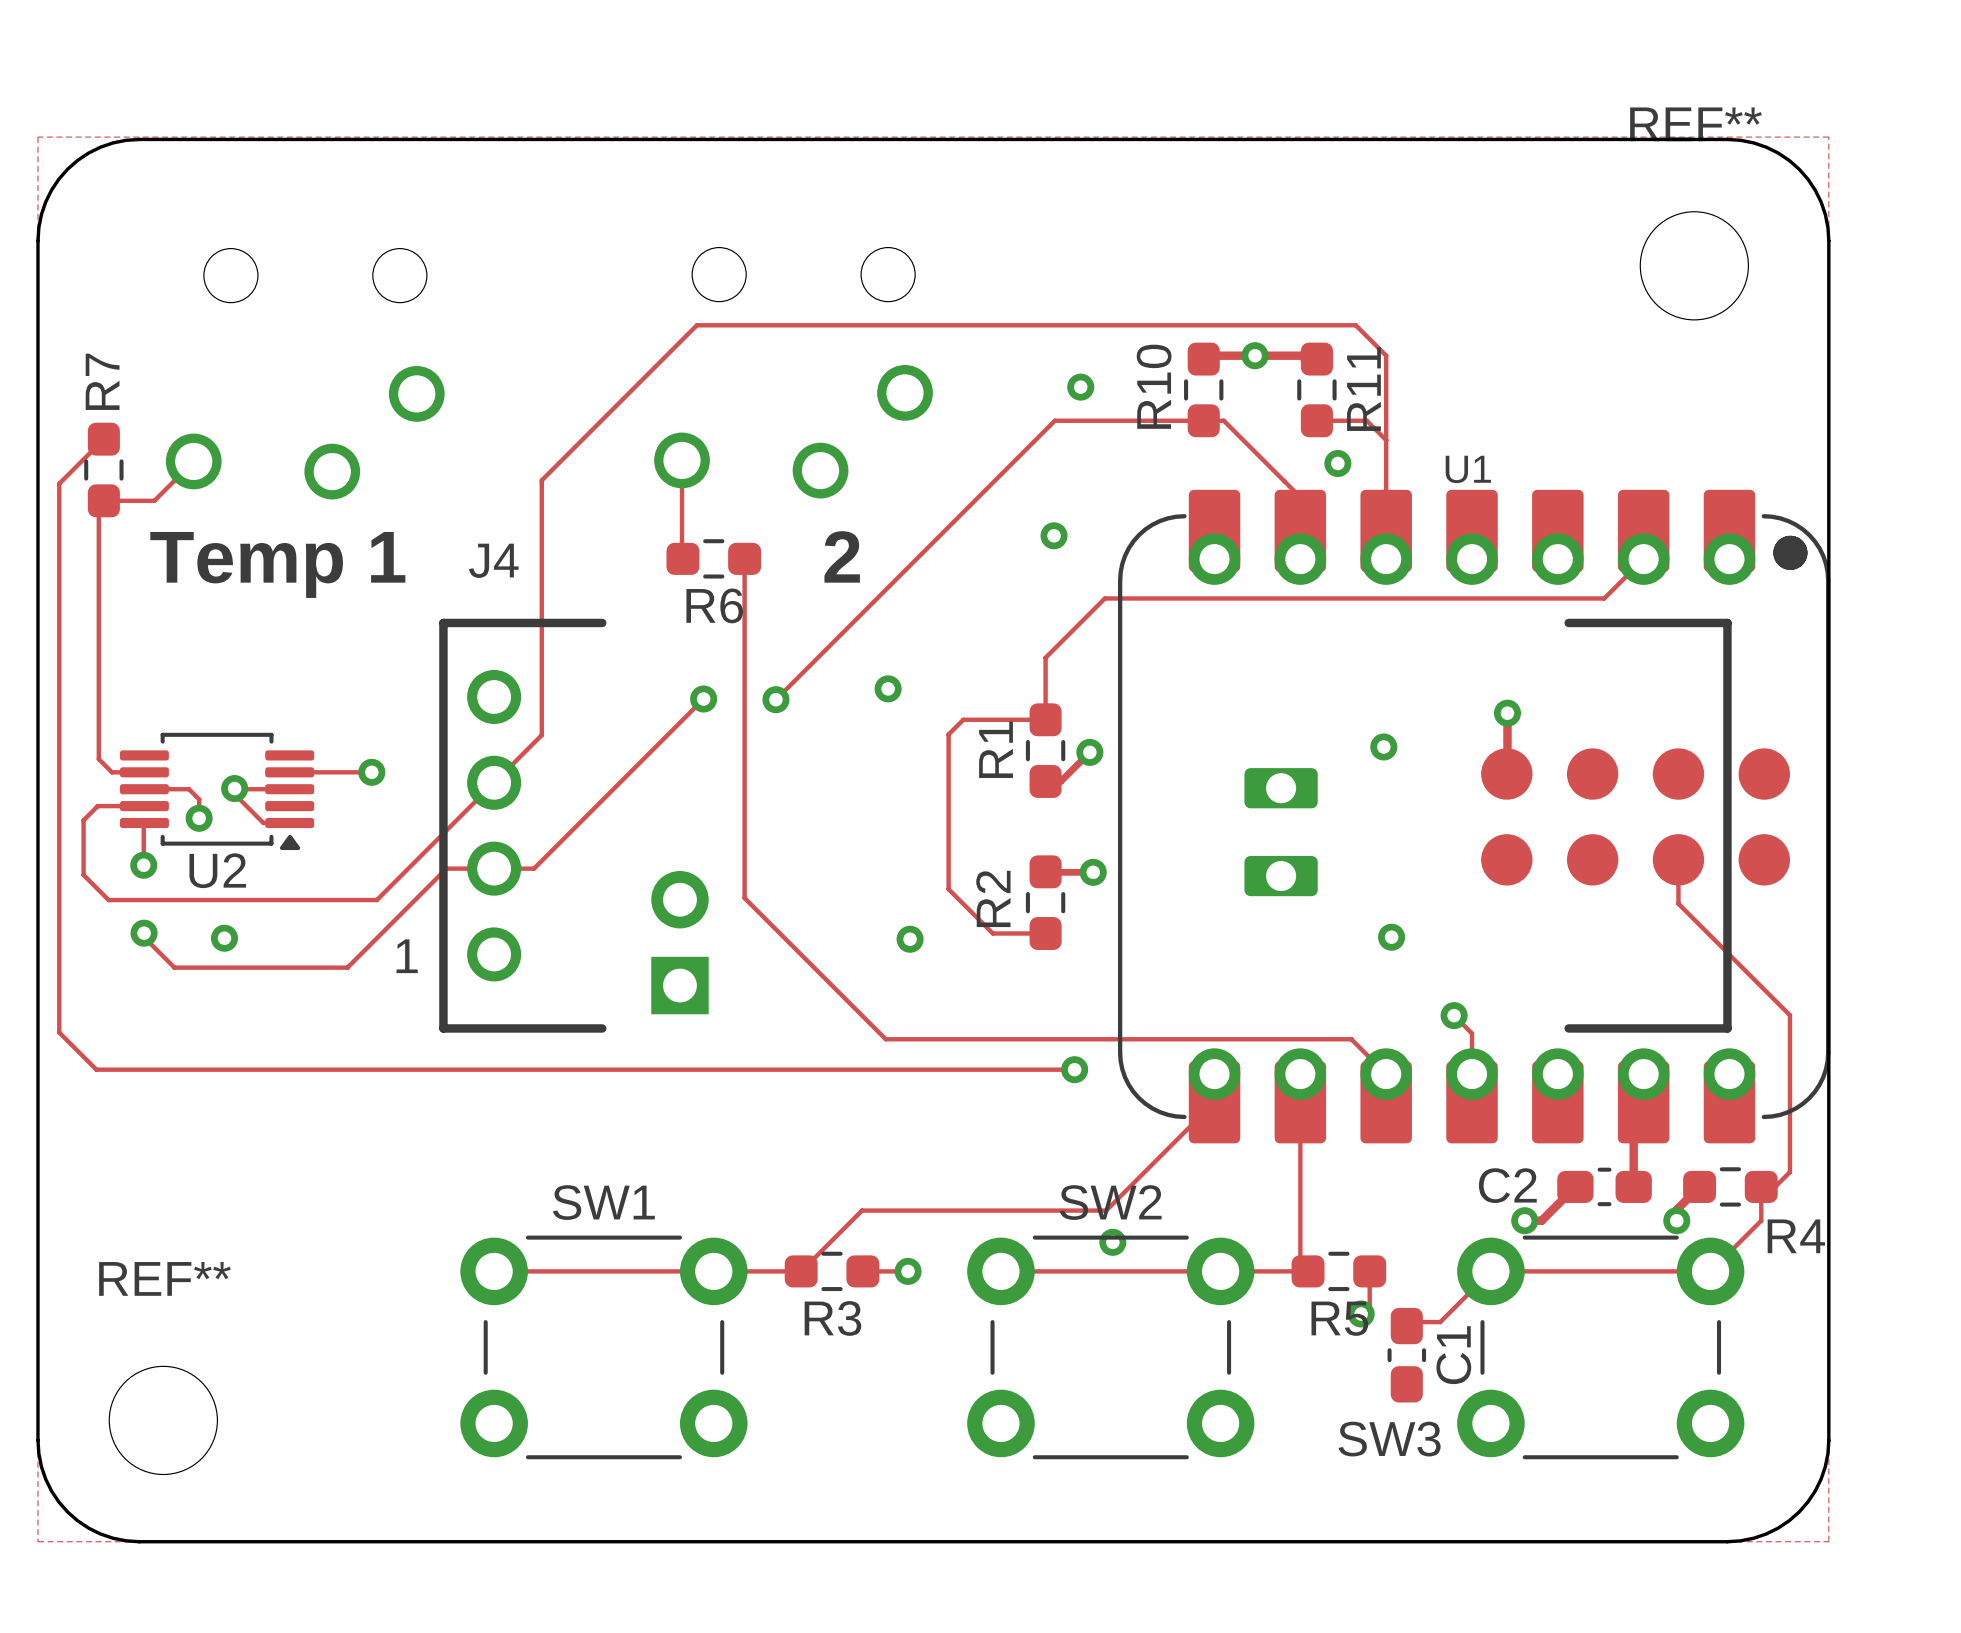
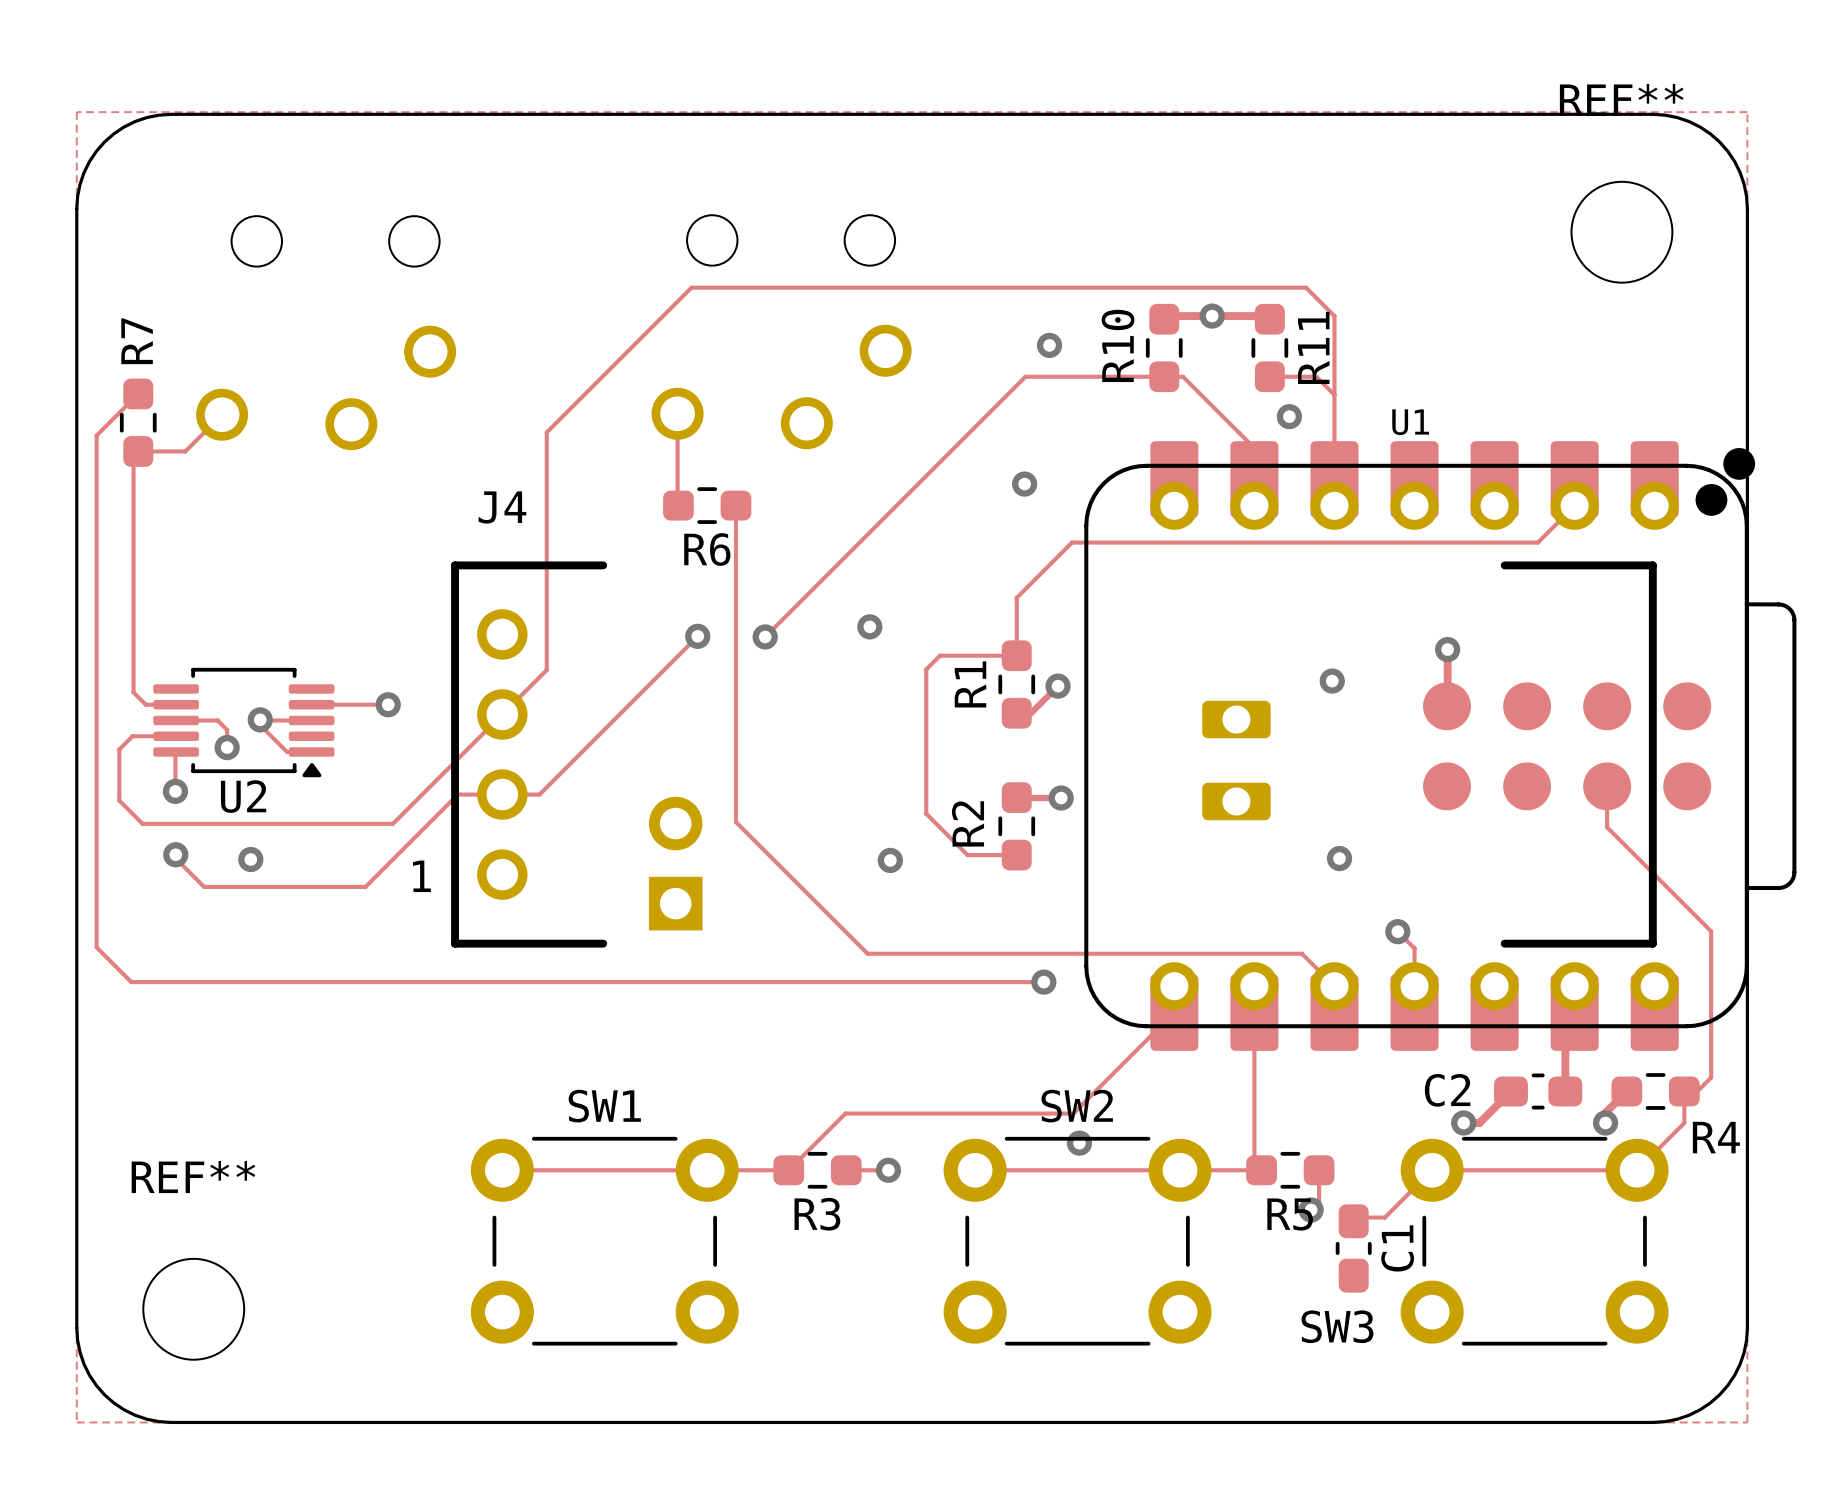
U1 footprint: [1117, 489, 1831, 1144] -> [1084, 441, 1797, 1051]
text: 2 (842, 556) -> none
text: Temp 1 (277, 564) -> none

